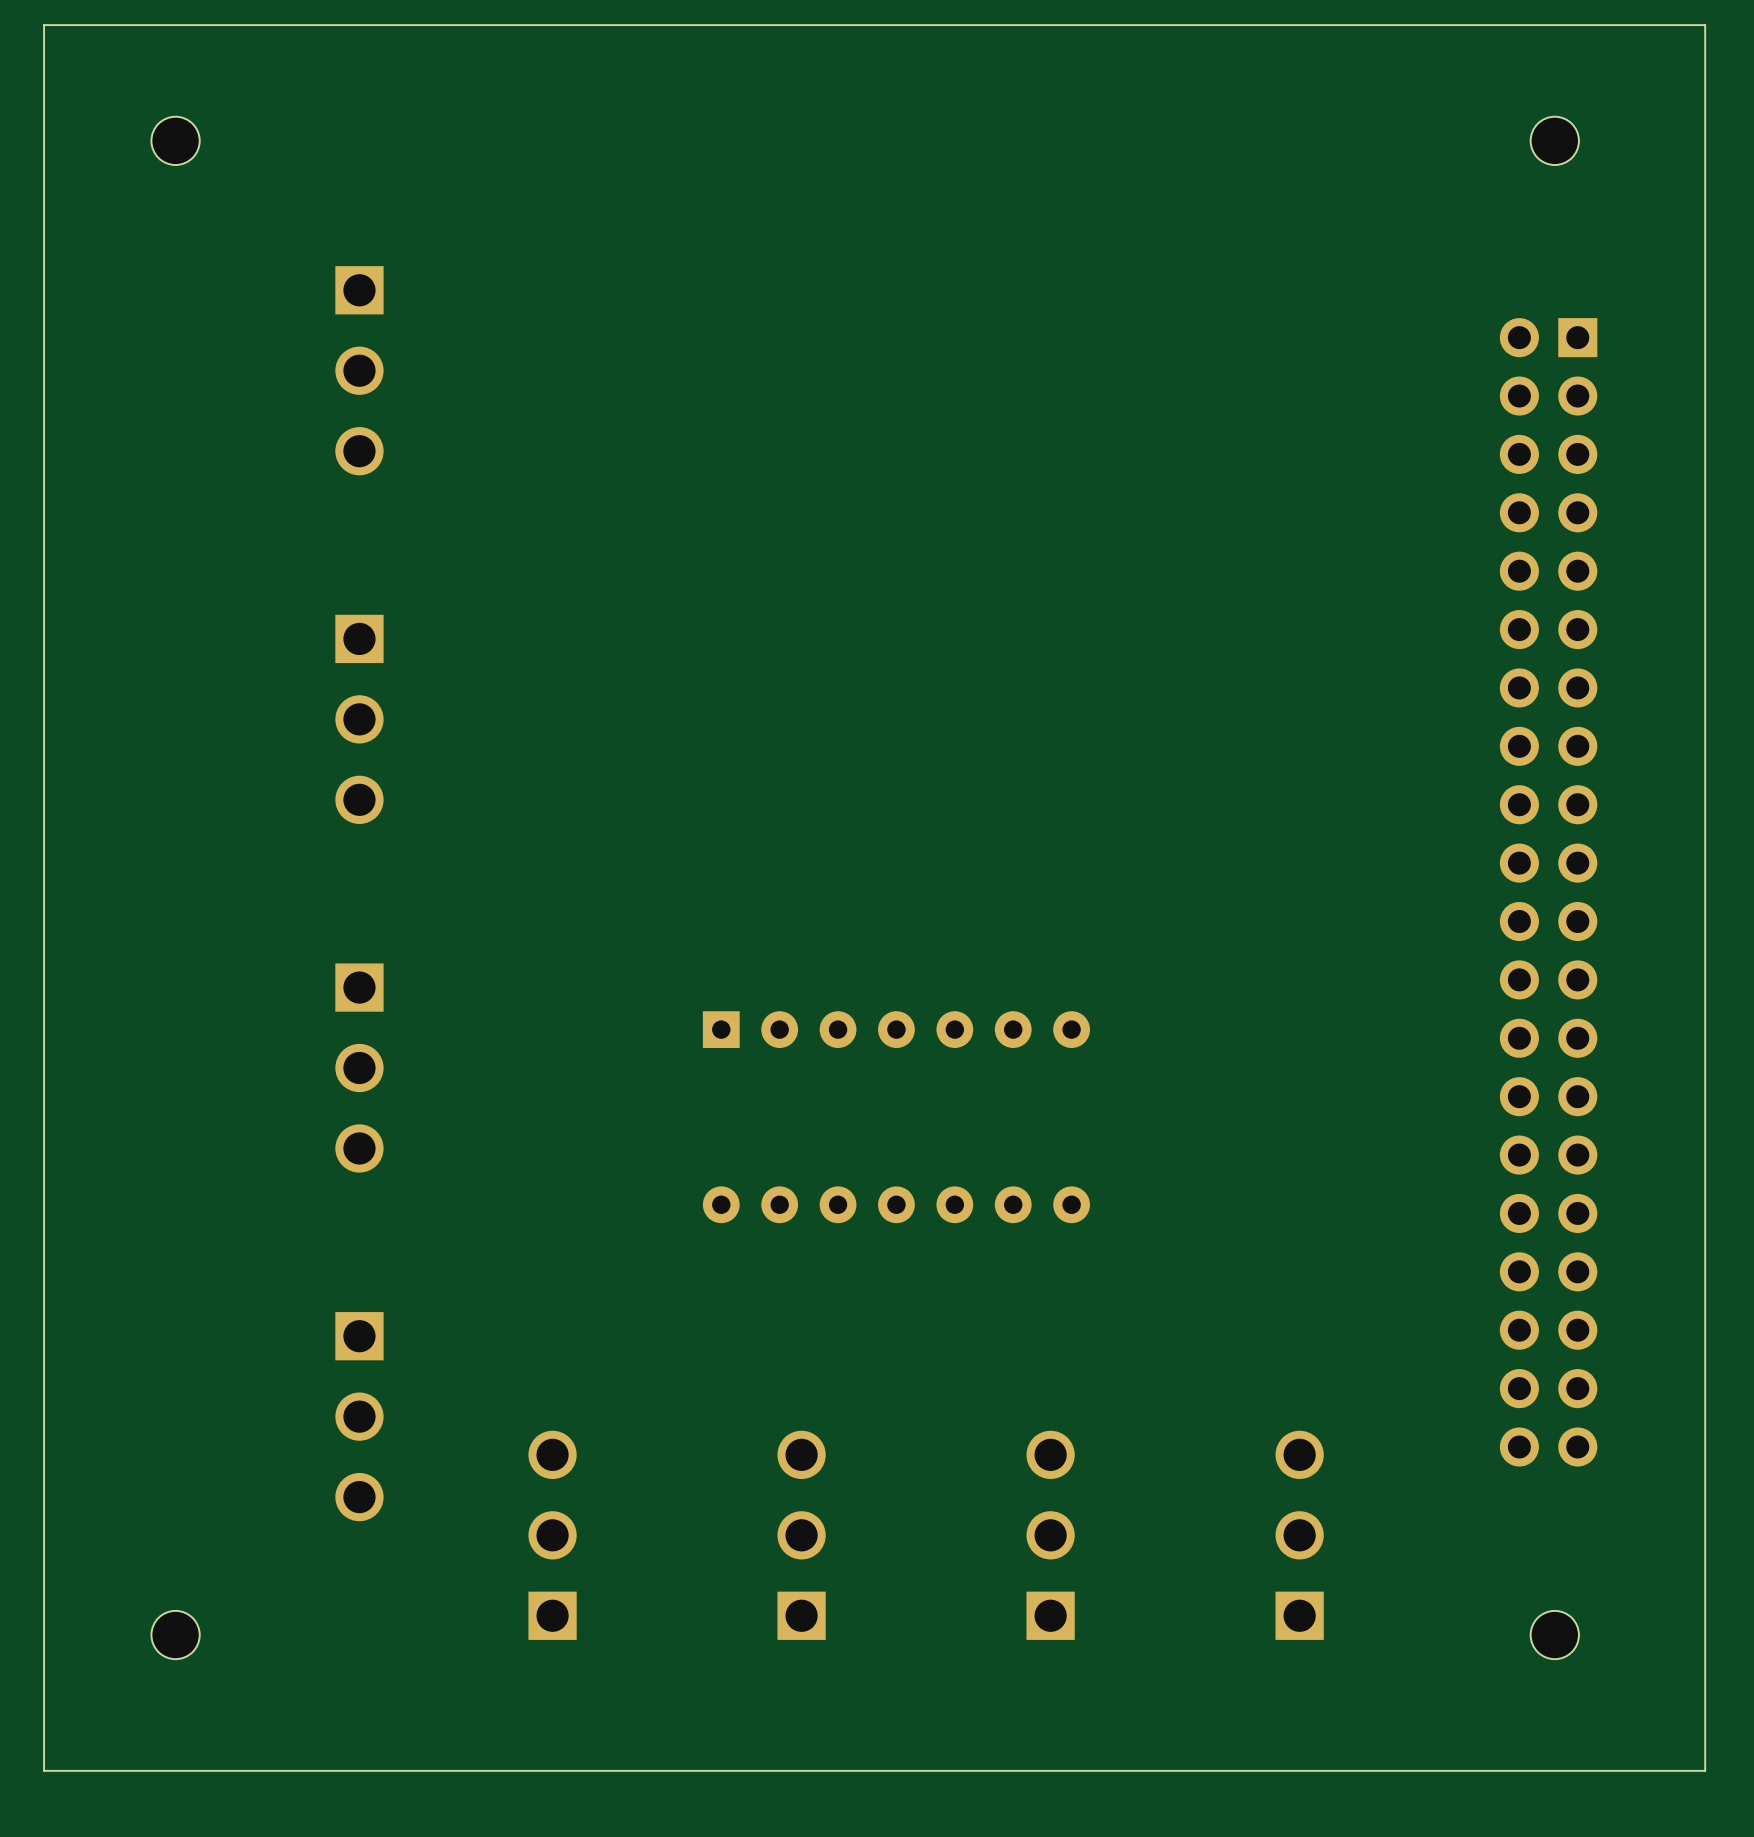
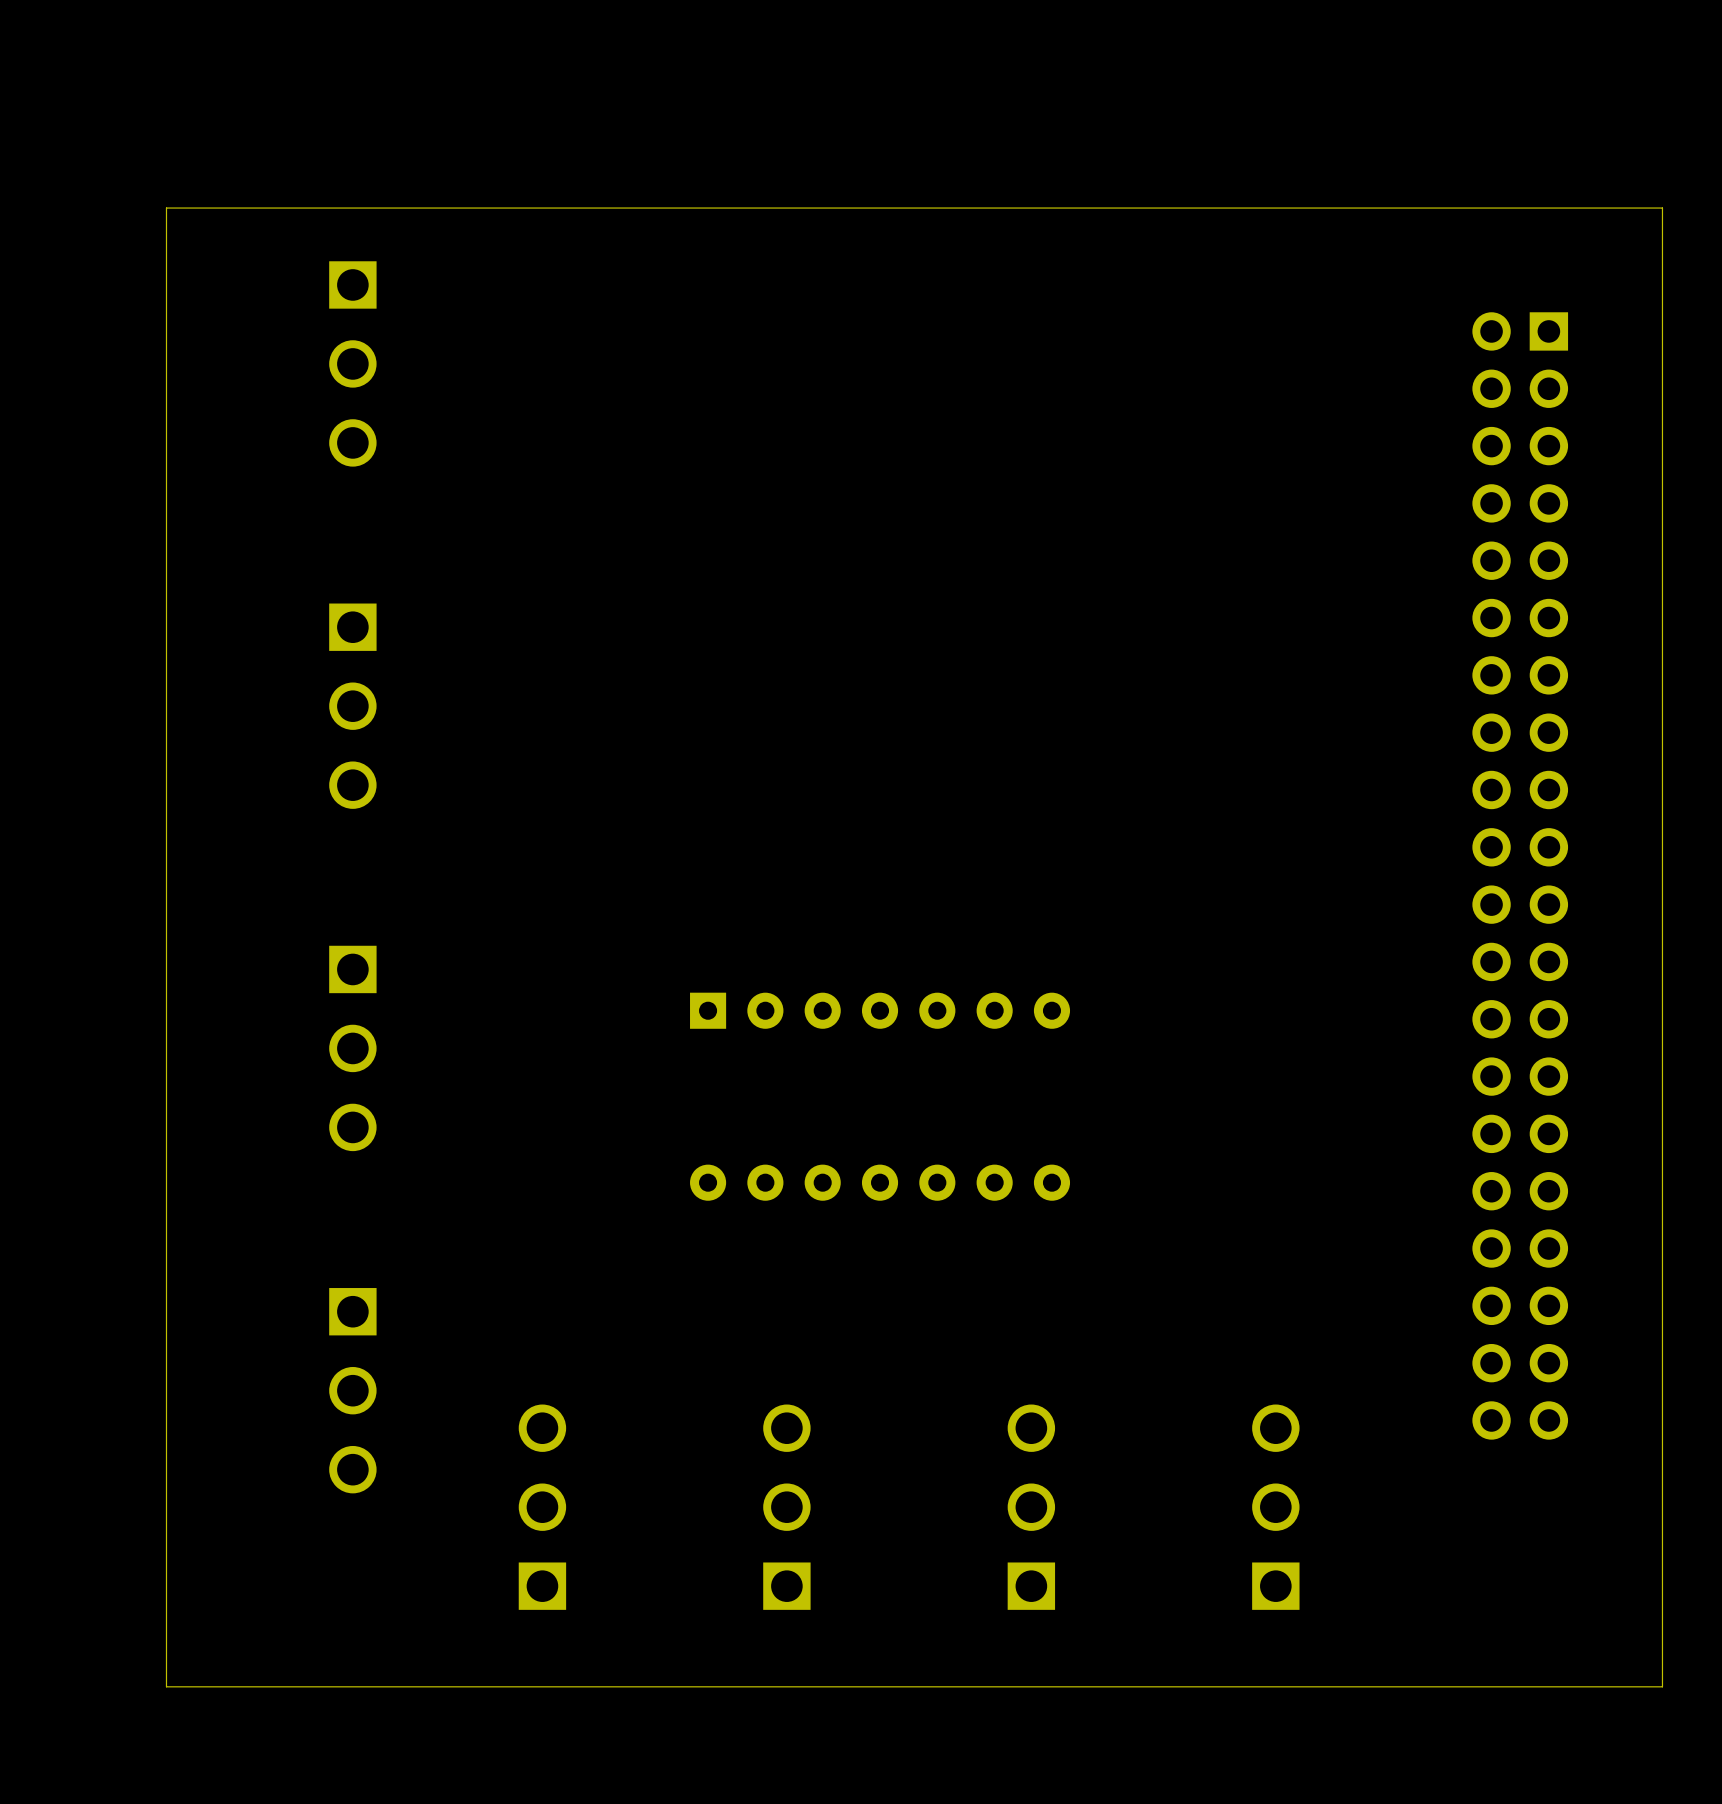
board edge: (1705, 25) (44, 25) (44, 1770) (1705, 1770) (1705, 25) -> (1662, 208) (1662, 1686) (166, 1686) (166, 208) (1662, 208)
part: (175, 140) -> none
part: (1554, 140) -> none
part: (175, 1635) -> none
part: (1554, 1635) -> none

